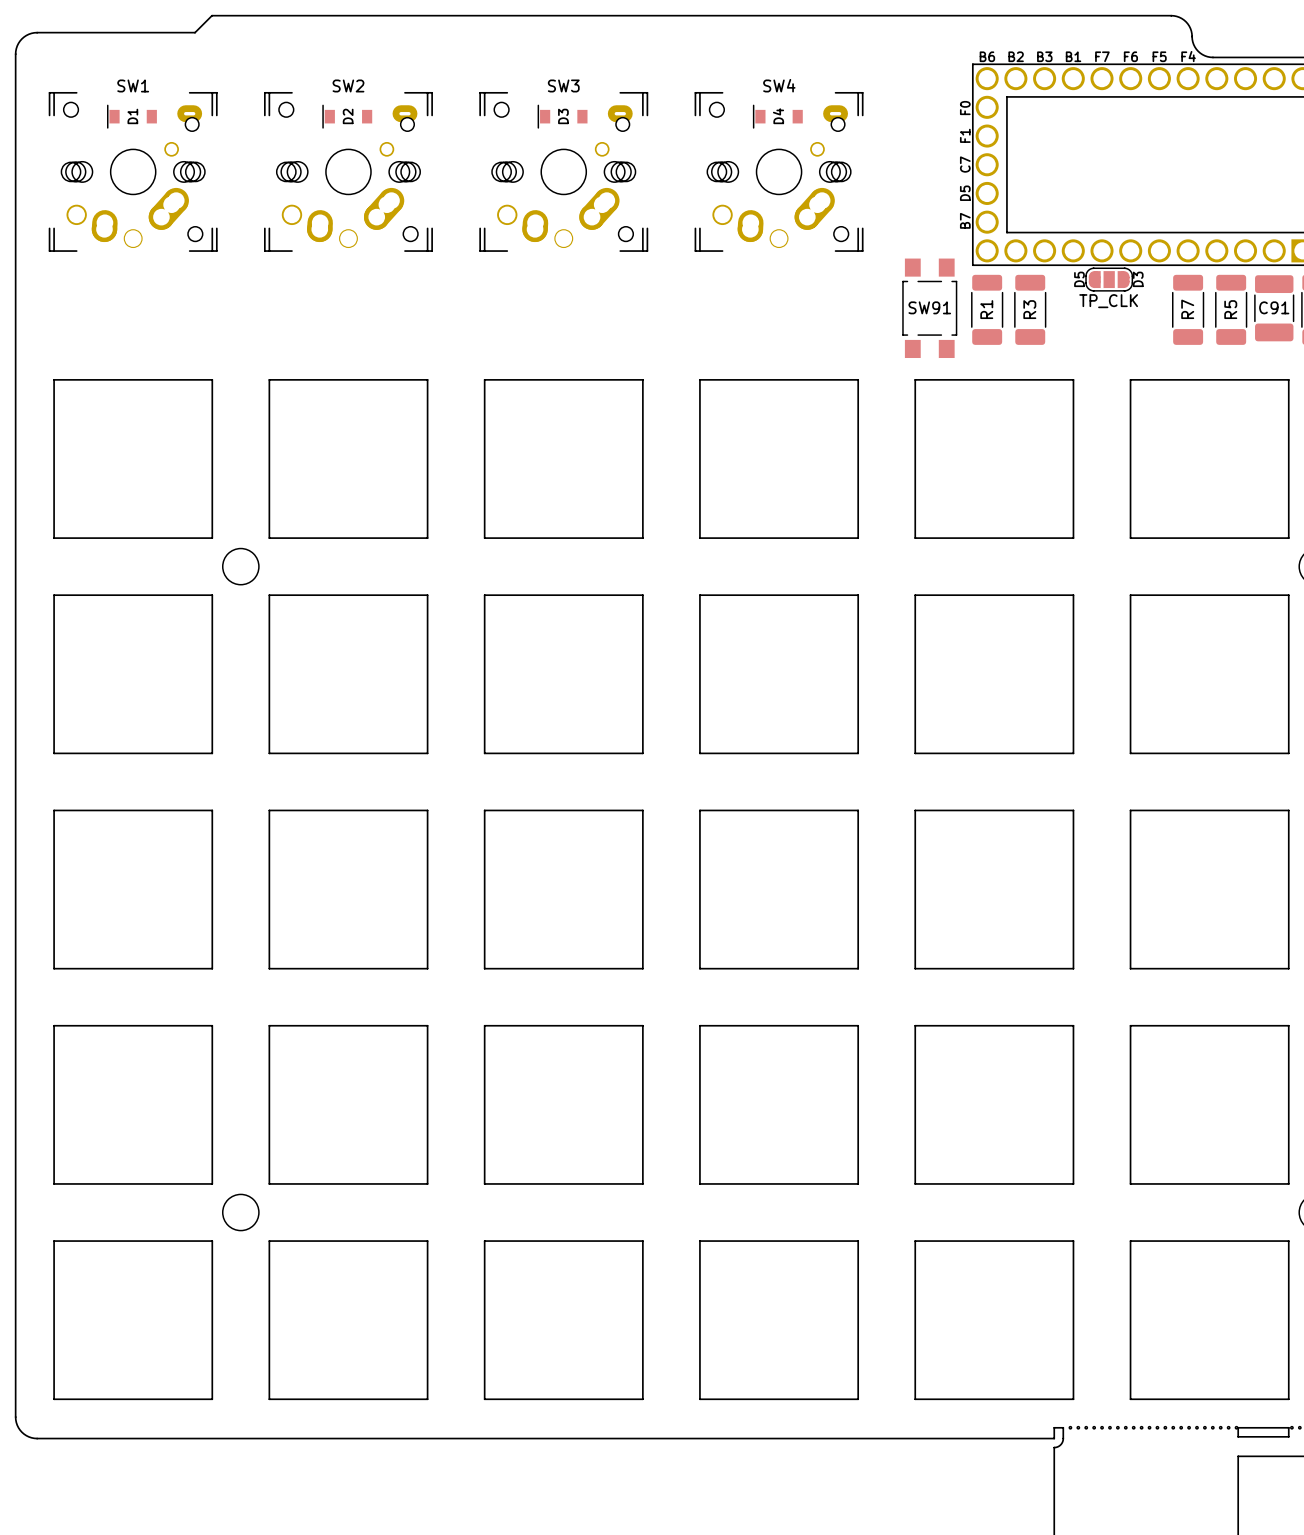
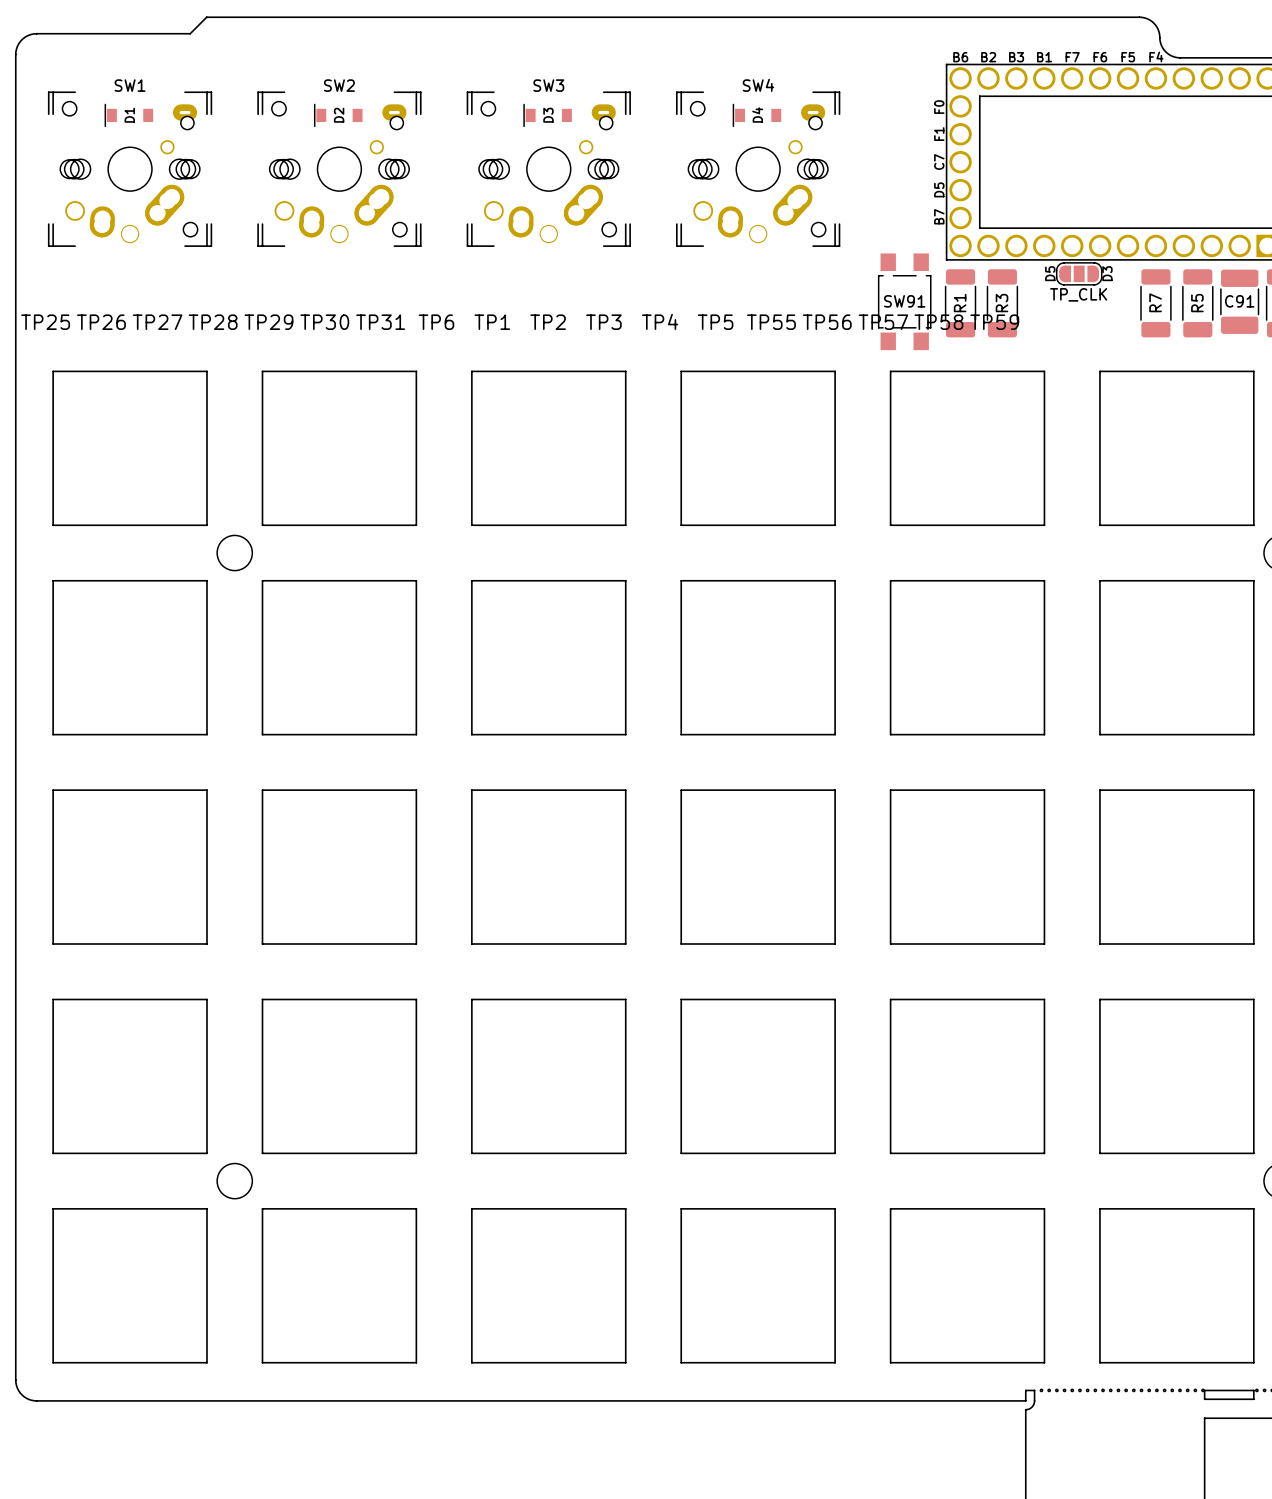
TP4: none -> (660, 321)
TP25: none -> (45, 322)
TP26: none -> (101, 322)
TP27: none -> (157, 322)
TP28: none -> (213, 322)
TP29: none -> (268, 322)
TP30: none -> (324, 322)
TP31: none -> (380, 322)
TP6: none -> (436, 322)
TP1: none -> (492, 322)
TP2: none -> (548, 322)
TP3: none -> (603, 322)
TP5: none -> (715, 322)
TP55: none -> (771, 322)
TP56: none -> (827, 322)
TP57: none -> (883, 322)
TP58: none -> (938, 322)
TP59: none -> (994, 322)

